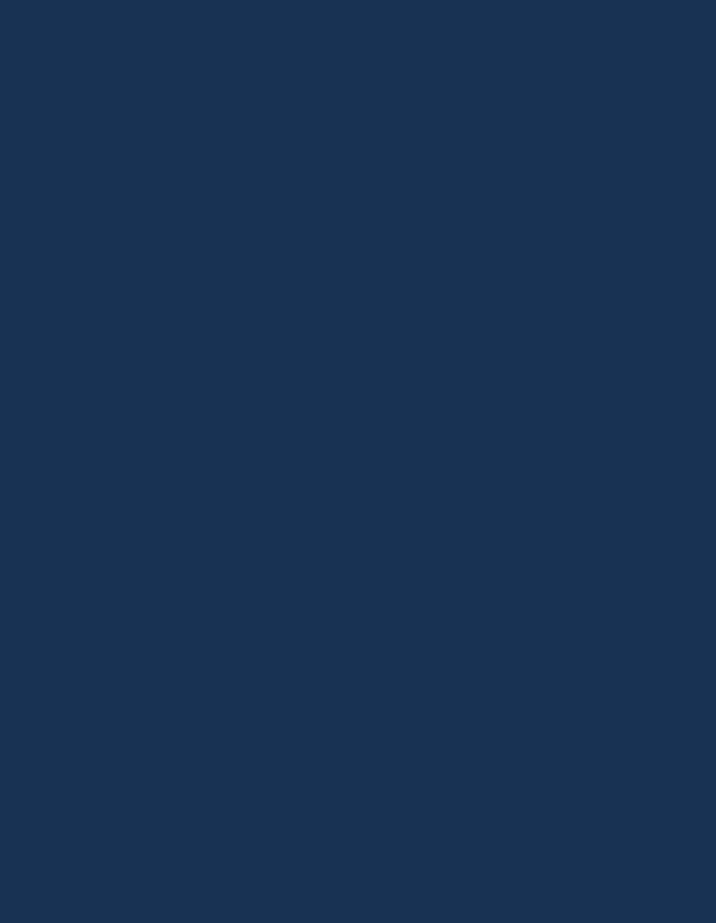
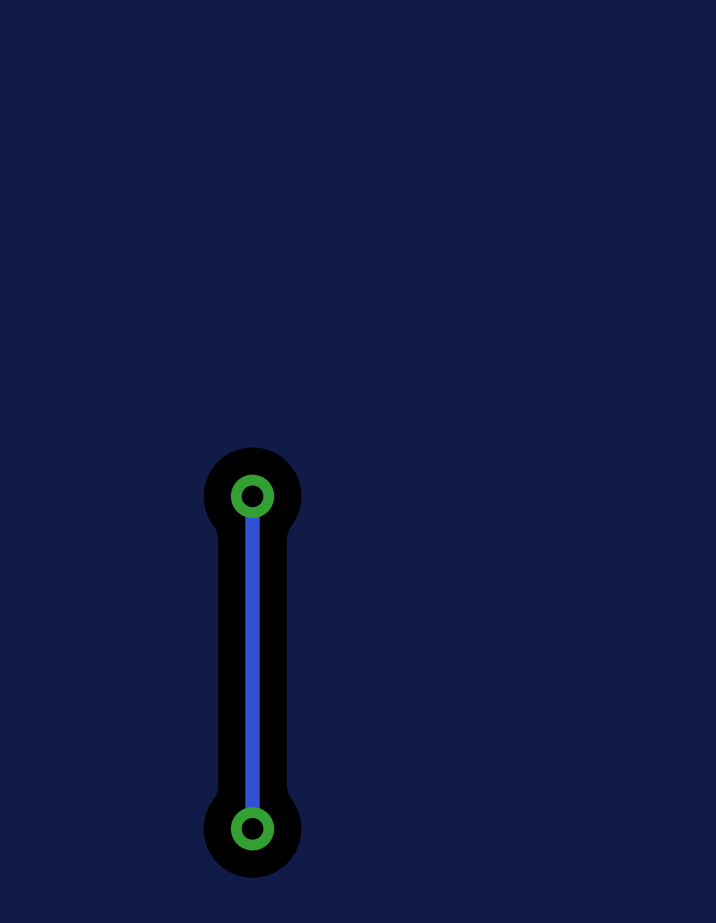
track: none -> (252, 496) (252, 828)
via: none -> (252, 496)
via: none -> (252, 828)

